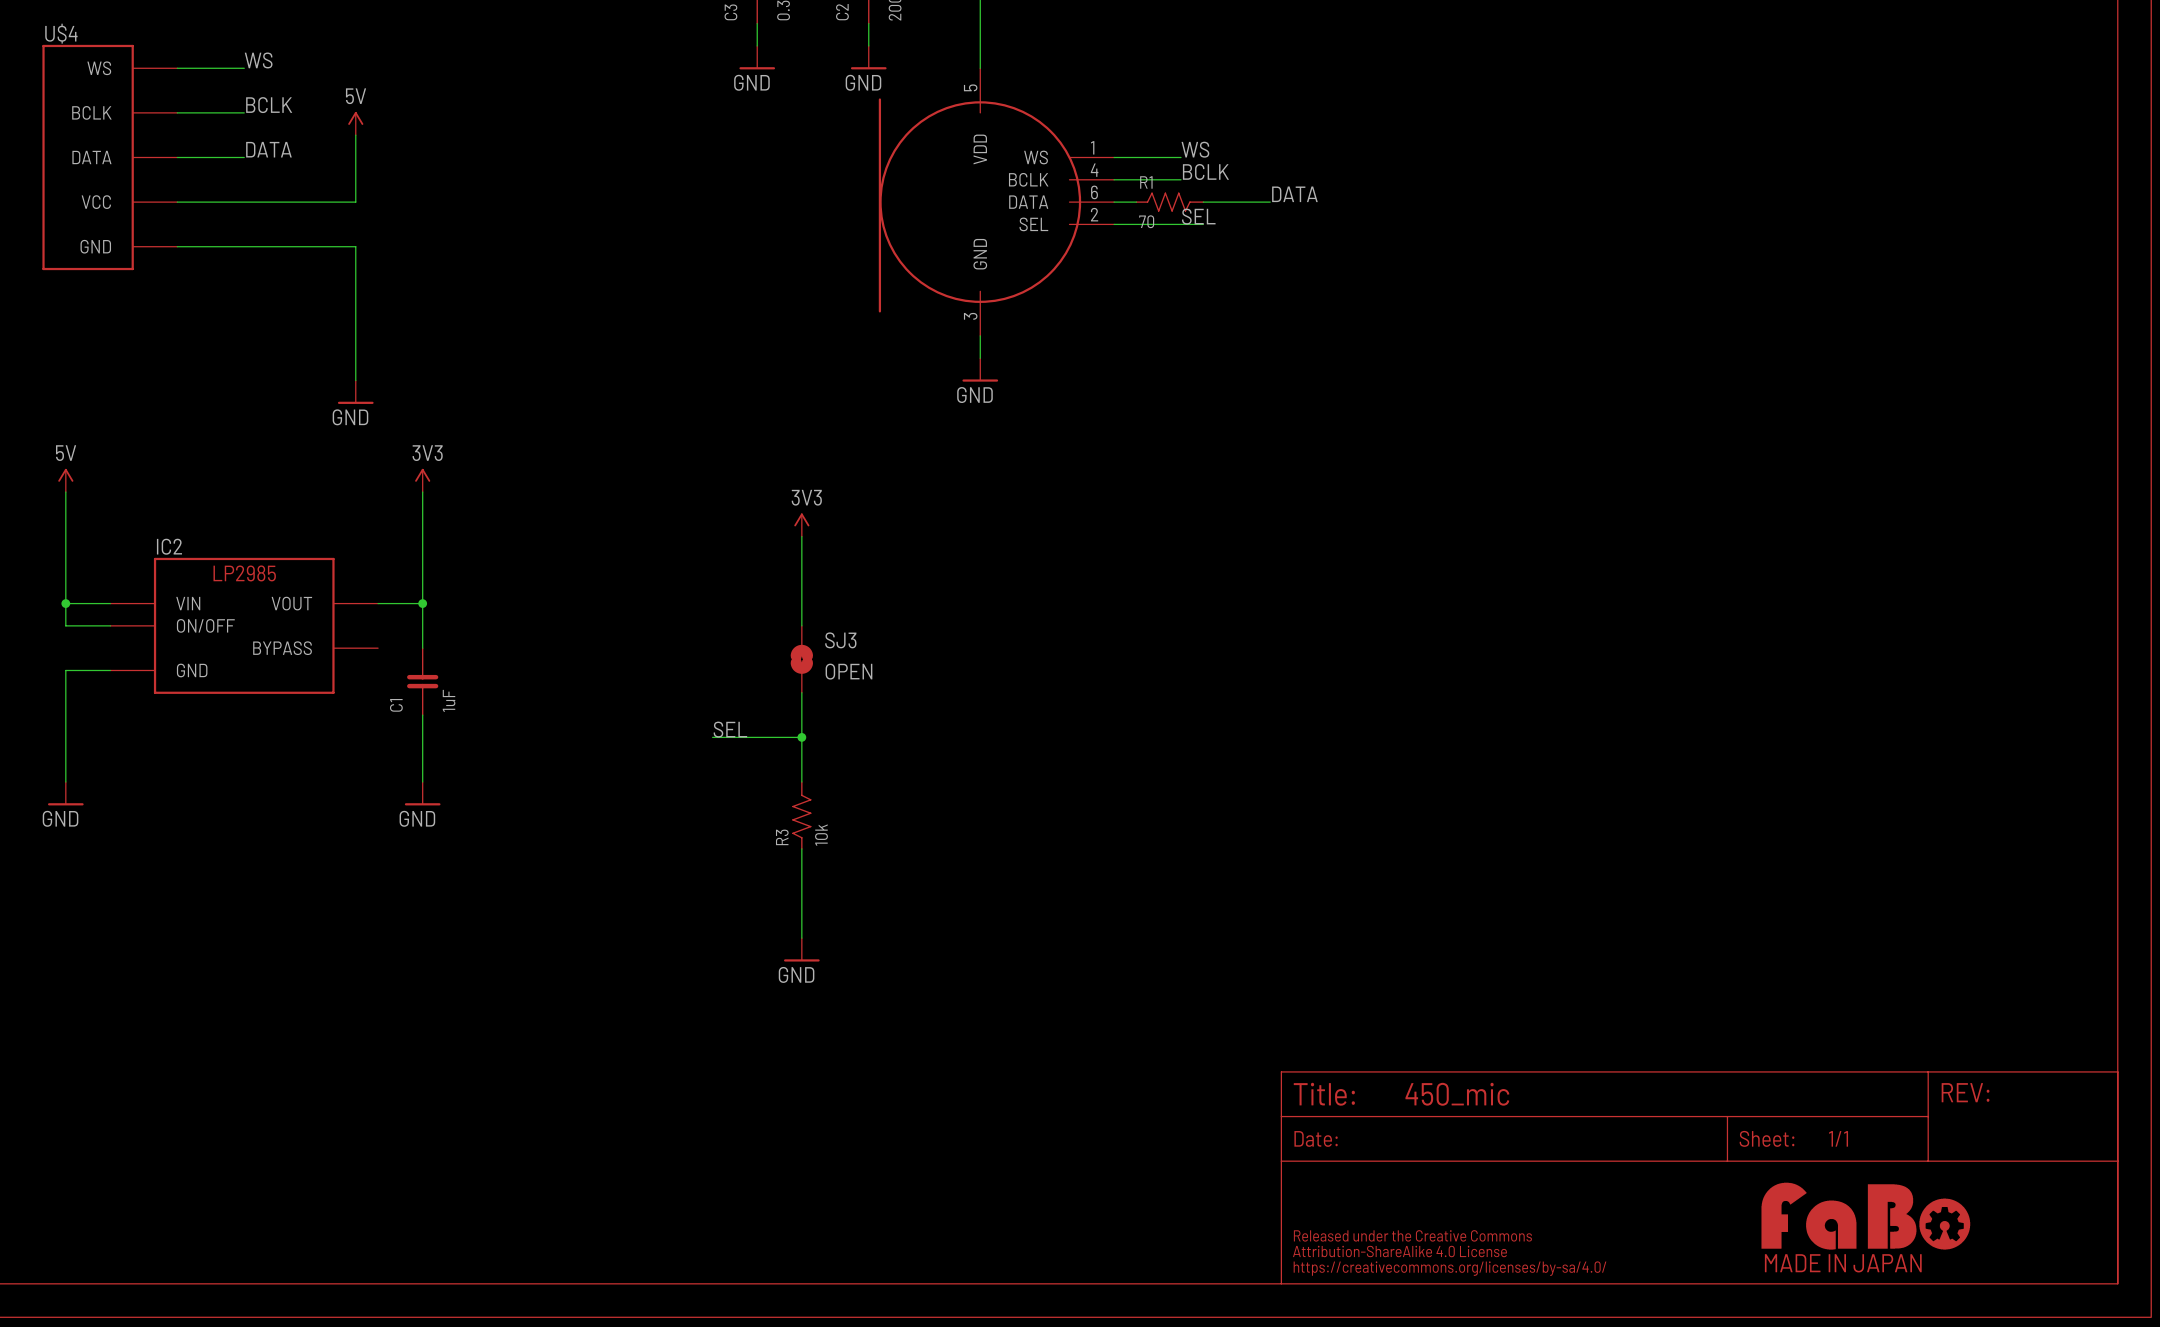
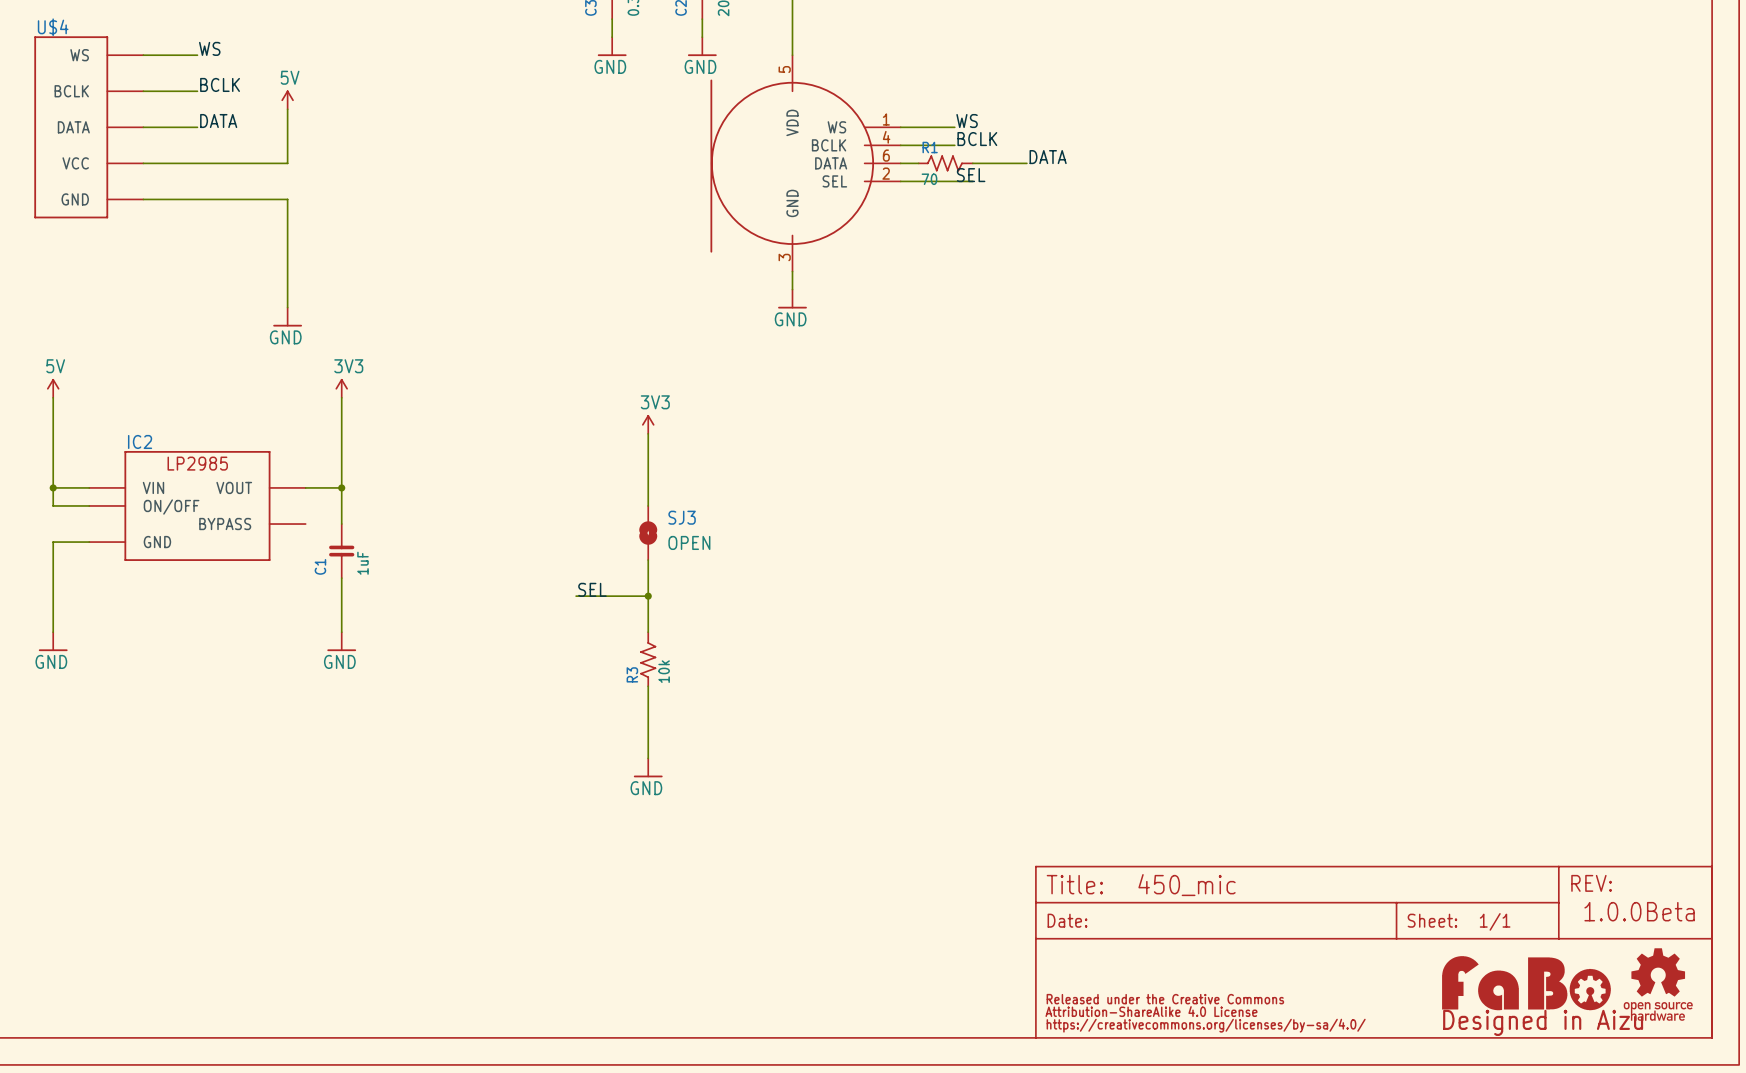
text: none -> 1.0.0Beta (1639, 911)
part: (1865, 1216) -> none
part: none -> (1526, 983)
part: none -> (1658, 984)

